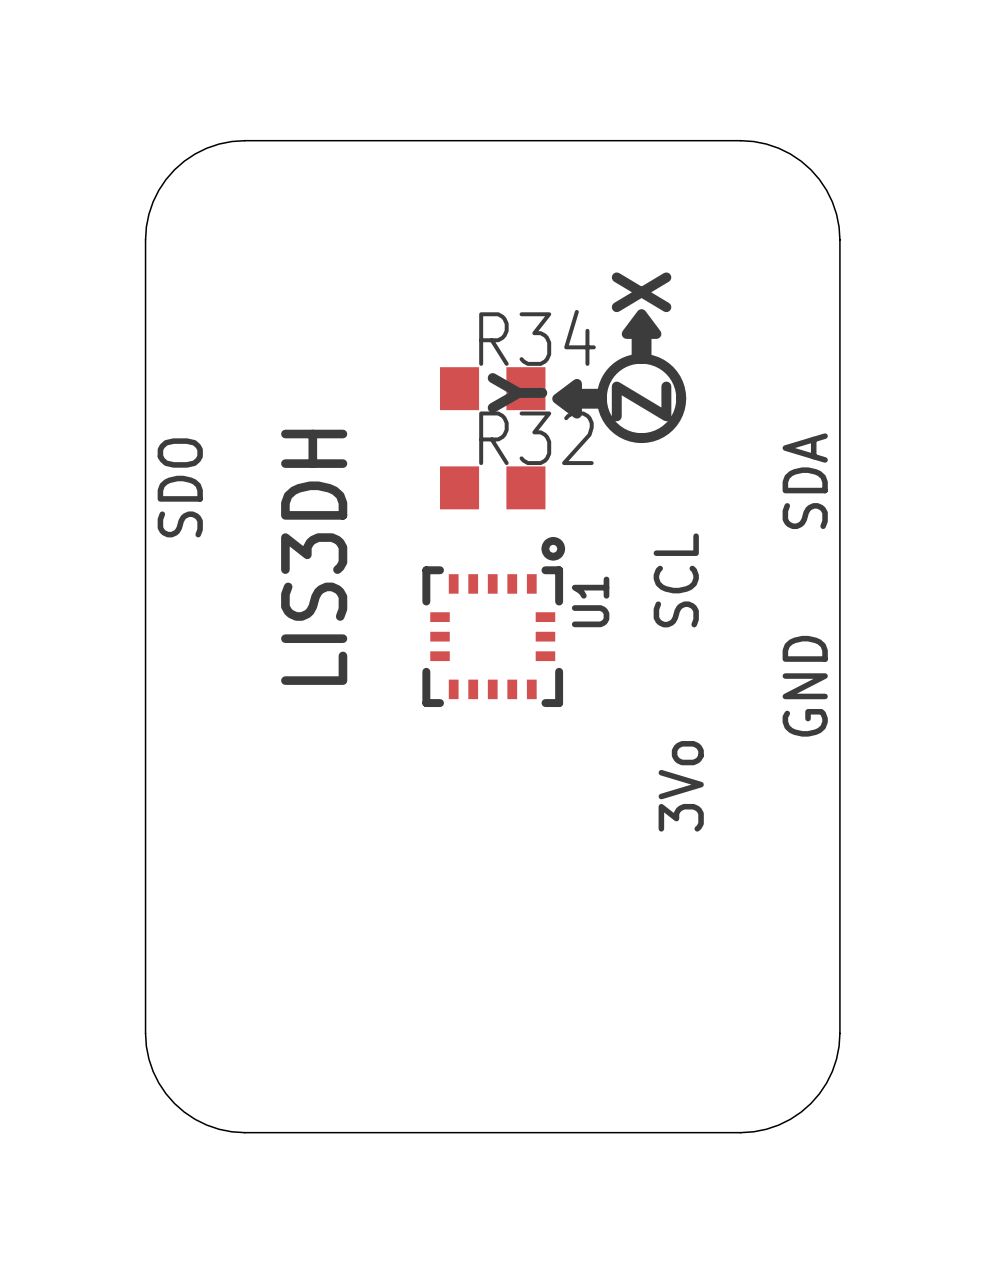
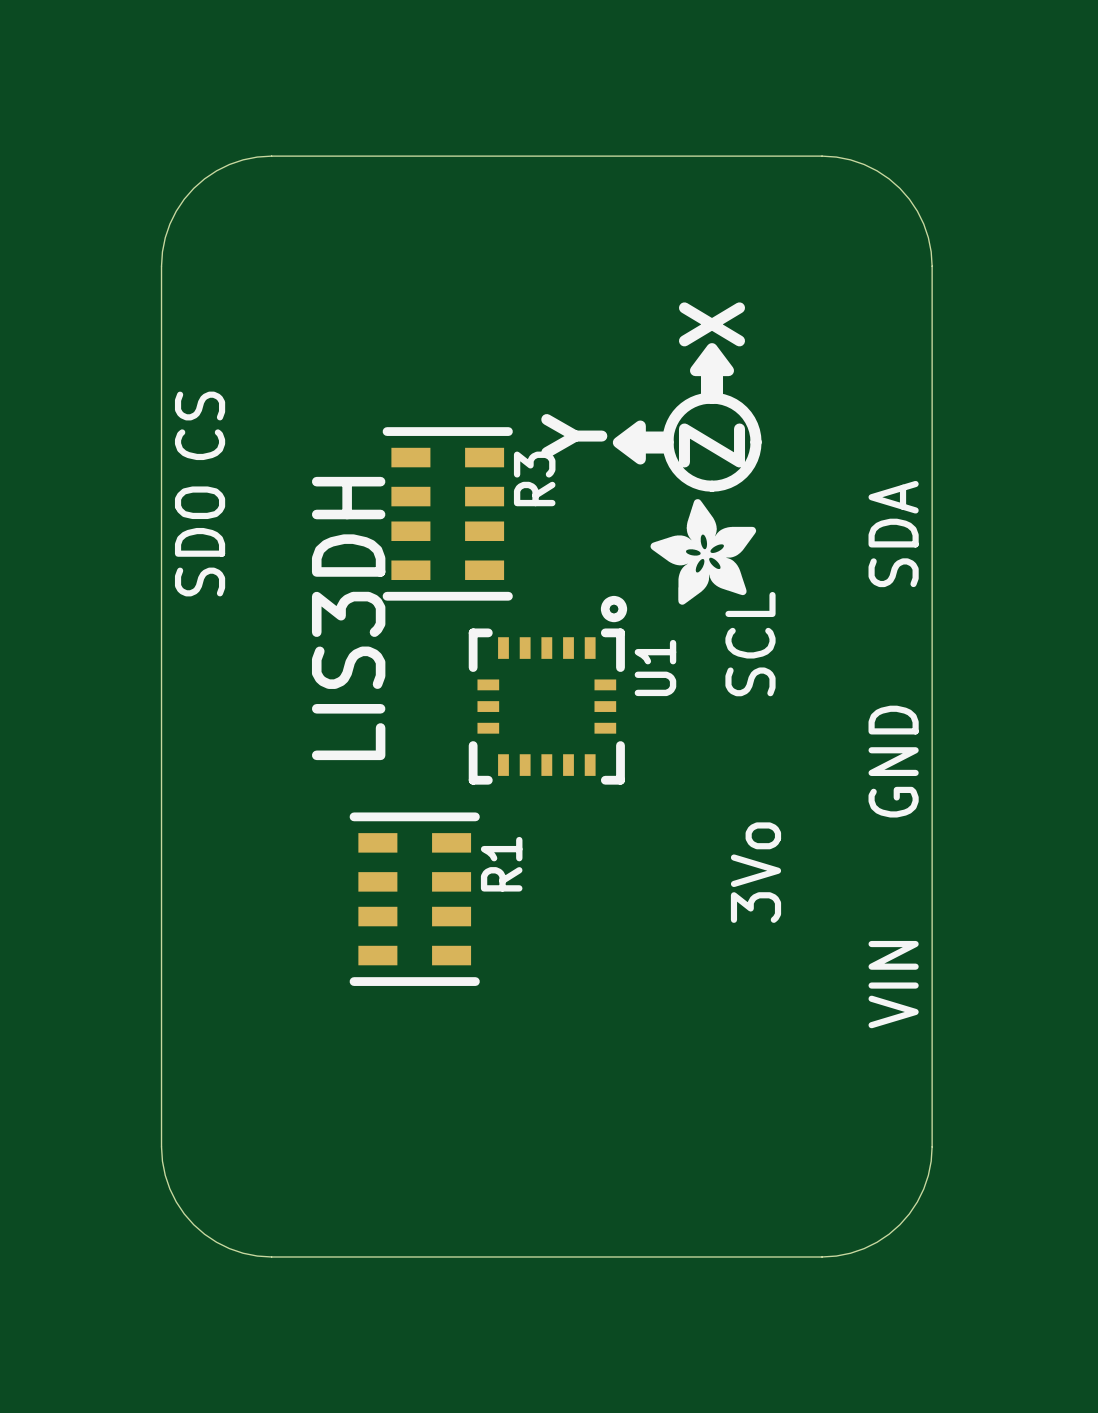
text: none -> CS (200, 425)
R34: (492, 388) -> none
drawing: none -> [650, 499, 757, 605]
R3: none -> (447, 513)
R32: (492, 487) -> none
R1: none -> (414, 899)
text: none -> VIN (893, 984)

